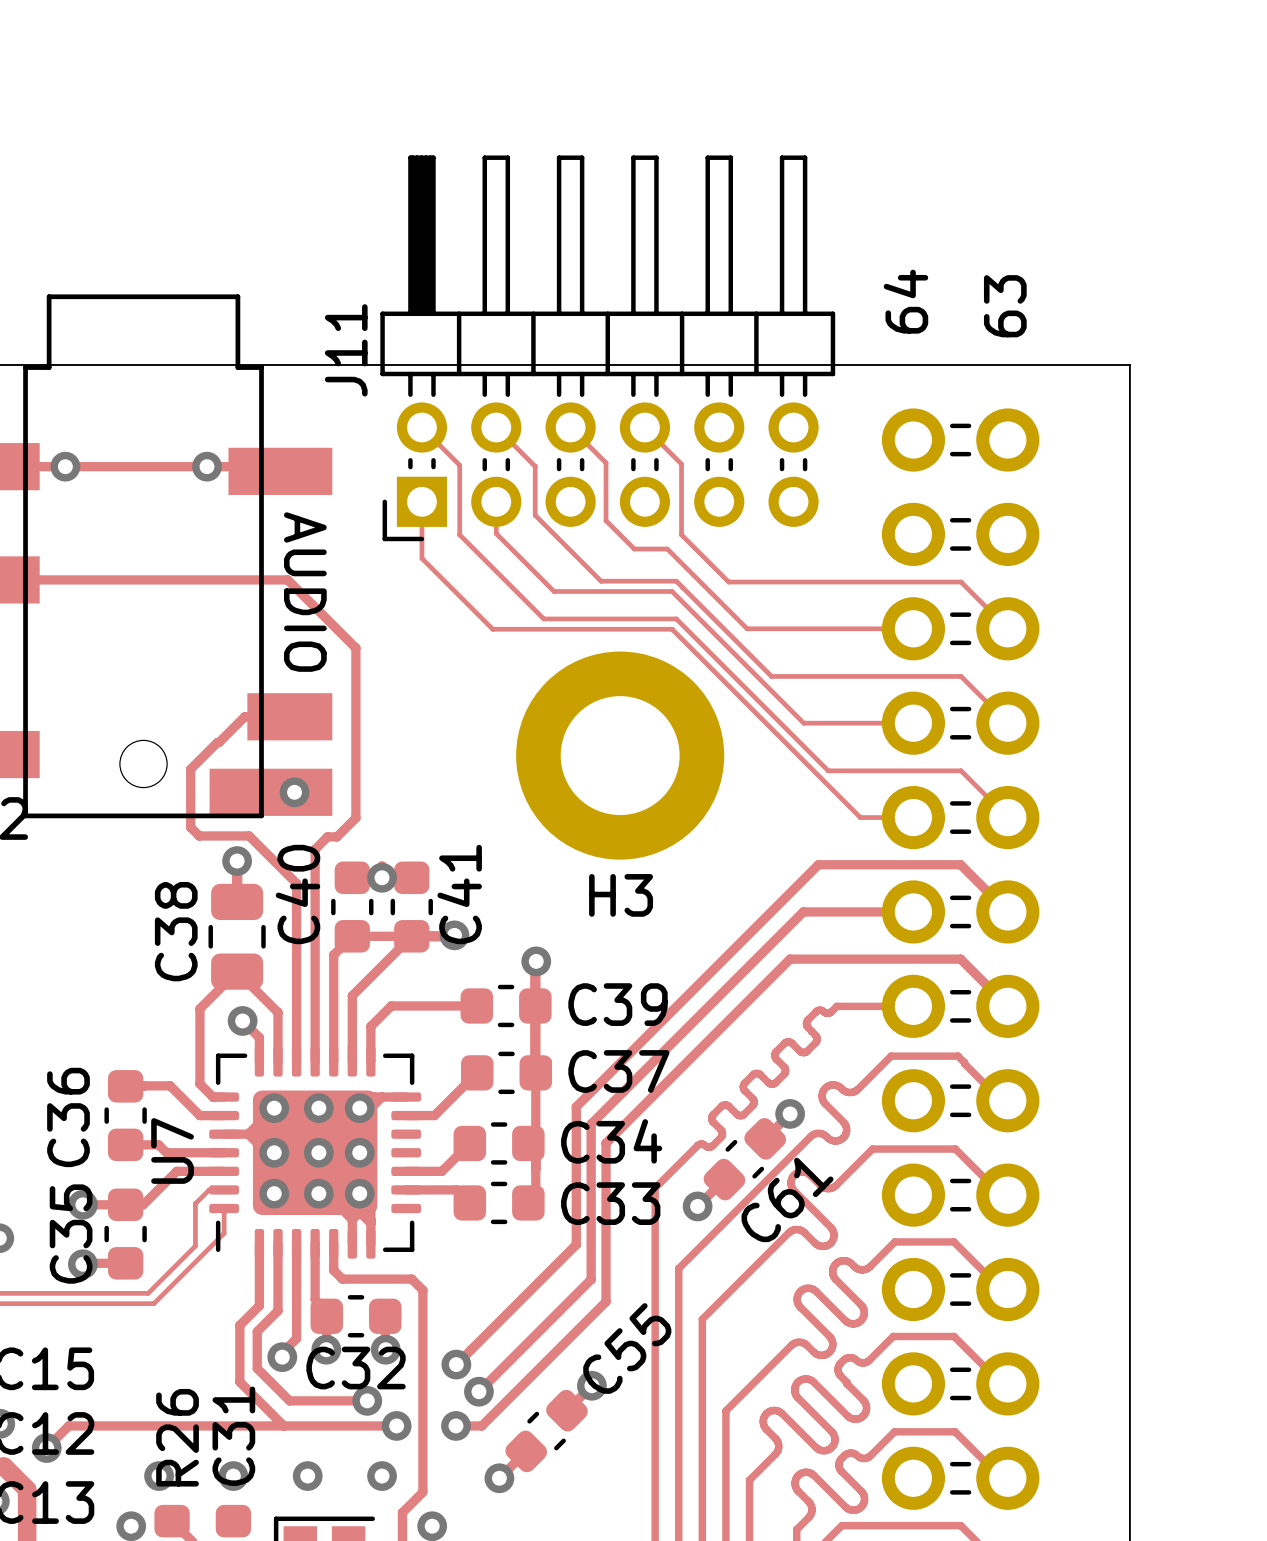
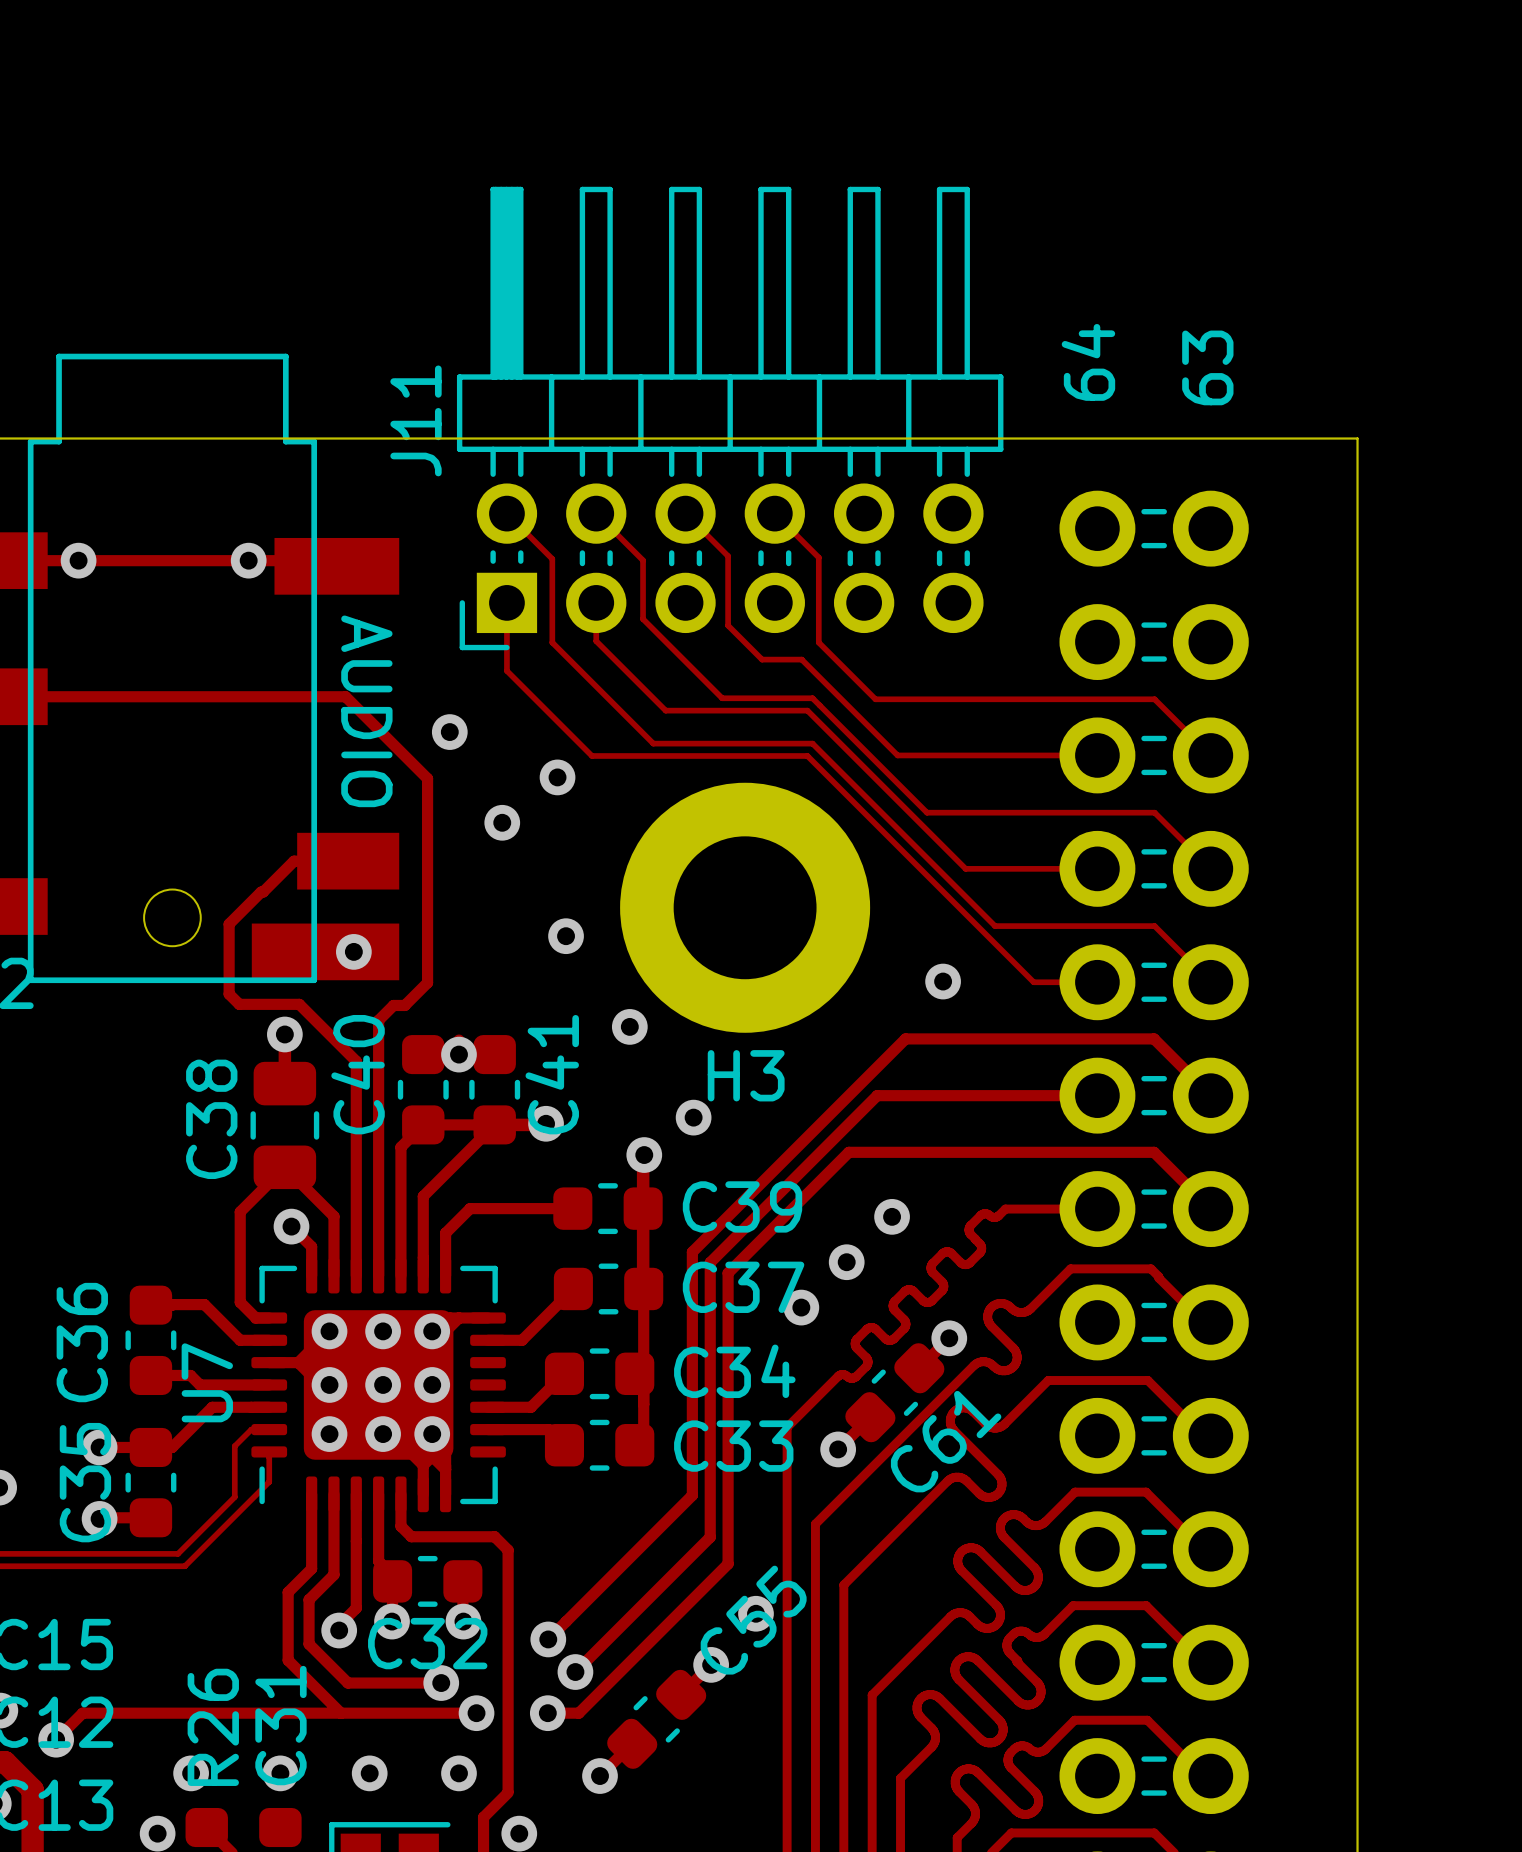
via: none -> (449, 732)
via: none -> (557, 777)
via: none -> (502, 822)
via: none -> (566, 936)
via: none -> (943, 981)
via: none -> (629, 1026)
track: (818, 864) (576, 1106) -> (983, 1038) (905, 1038) (692, 1252) (692, 1329)
track: (803, 911) (591, 1124) -> (965, 1095) (877, 1095) (710, 1262) (710, 1350)
via: none -> (693, 1117)
track: (790, 959) (606, 1143) -> (949, 1152) (848, 1152) (728, 1273) (728, 1373)
via: none -> (892, 1216)
via: none -> (846, 1262)
via: none -> (801, 1307)
via: none -> (755, 1613)

